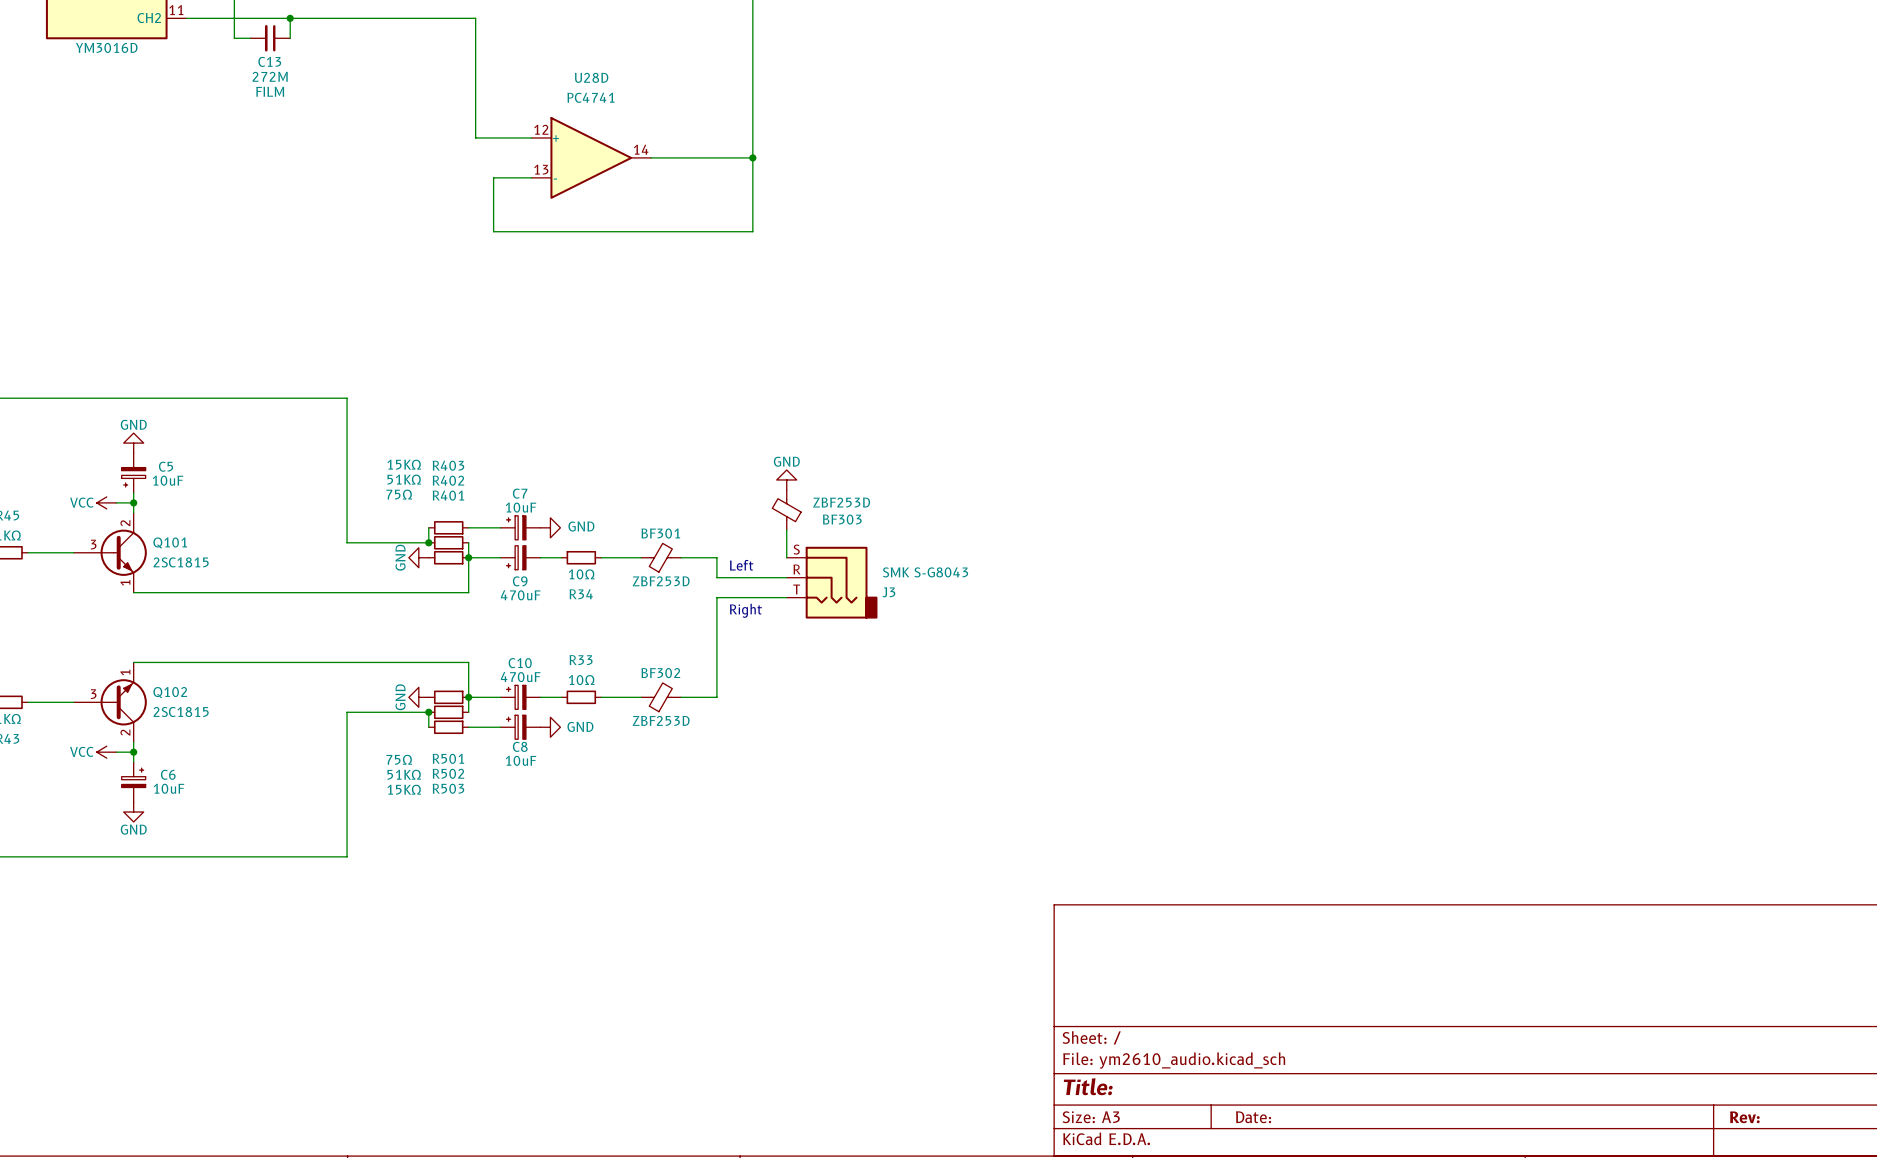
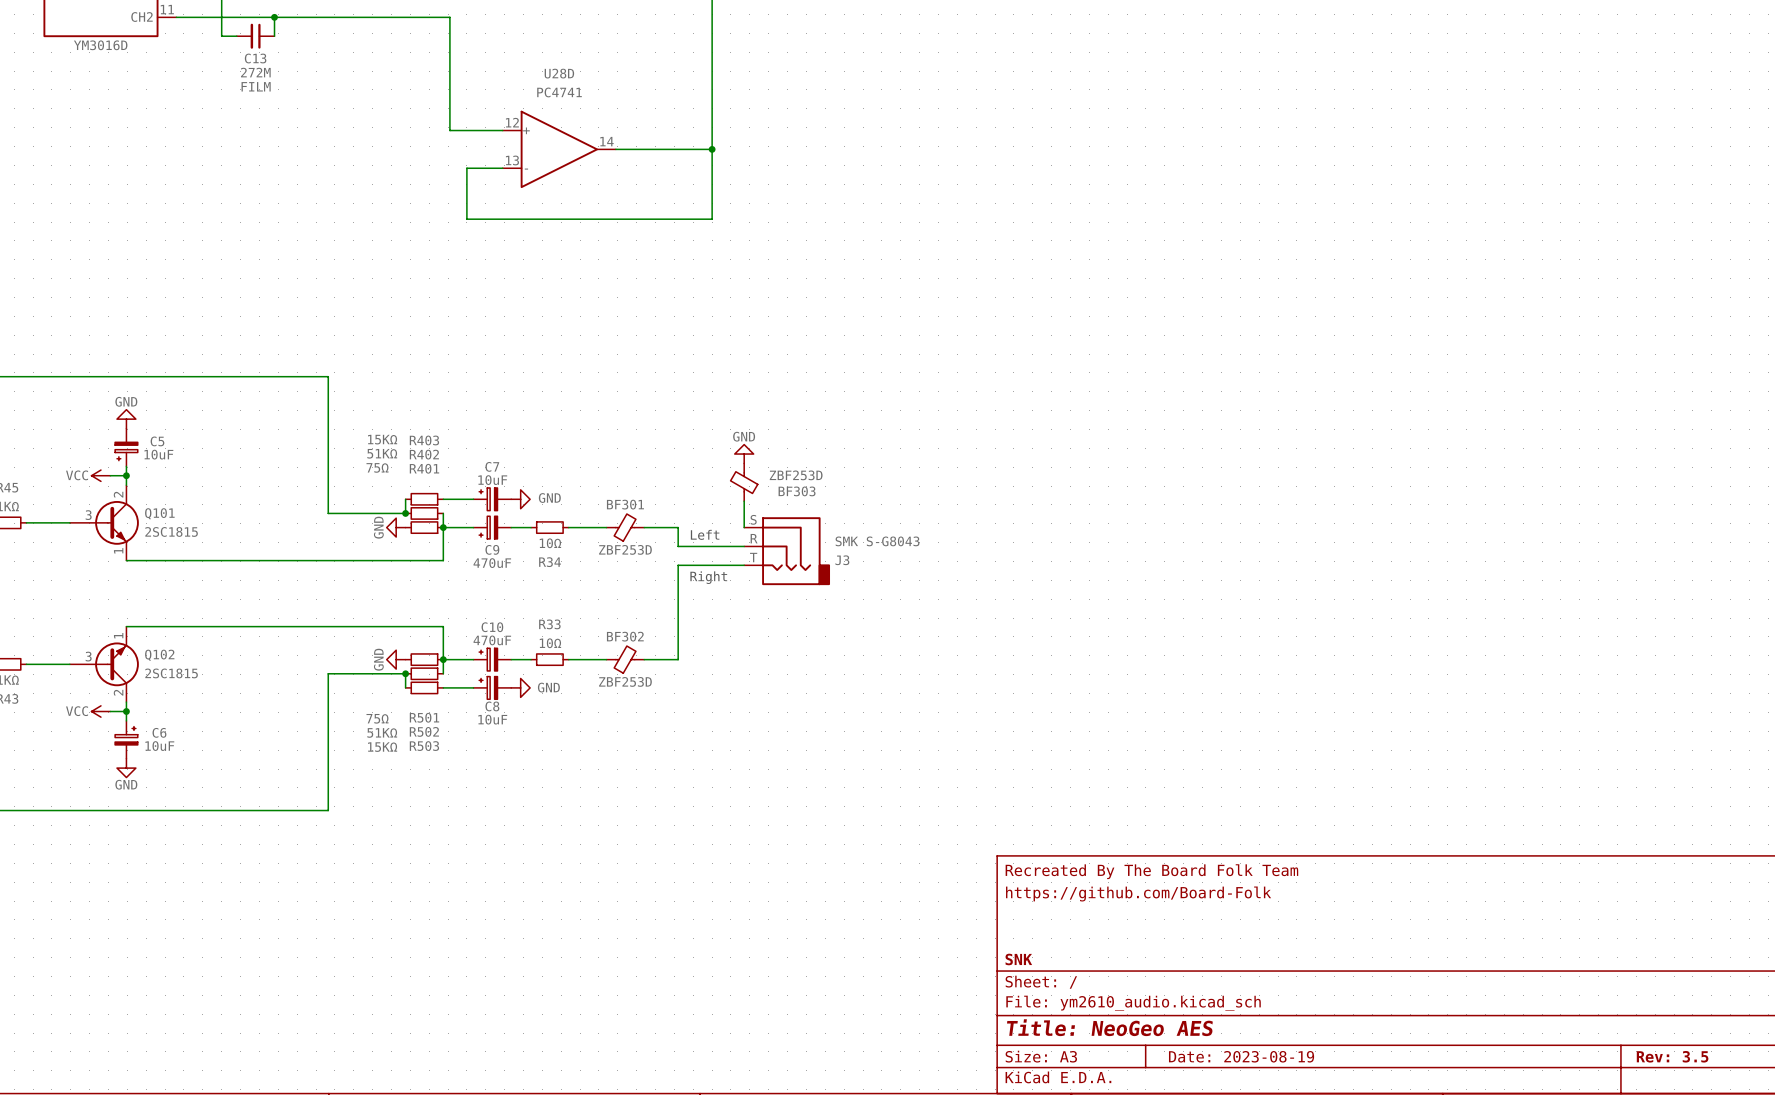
title block: none -> Recreated By The Board Folk Team (1151, 871)
title block: none -> https://github.com/Board-Folk (1138, 894)
title block: none -> SNK (1018, 959)
title block: Title: (1088, 1086) -> Title: NeoGeo AES (1109, 1027)
title block: Date: (1253, 1117) -> Date: 2023-08-19 (1241, 1056)
title block: Rev: (1744, 1117) -> Rev: 3.5 (1672, 1056)

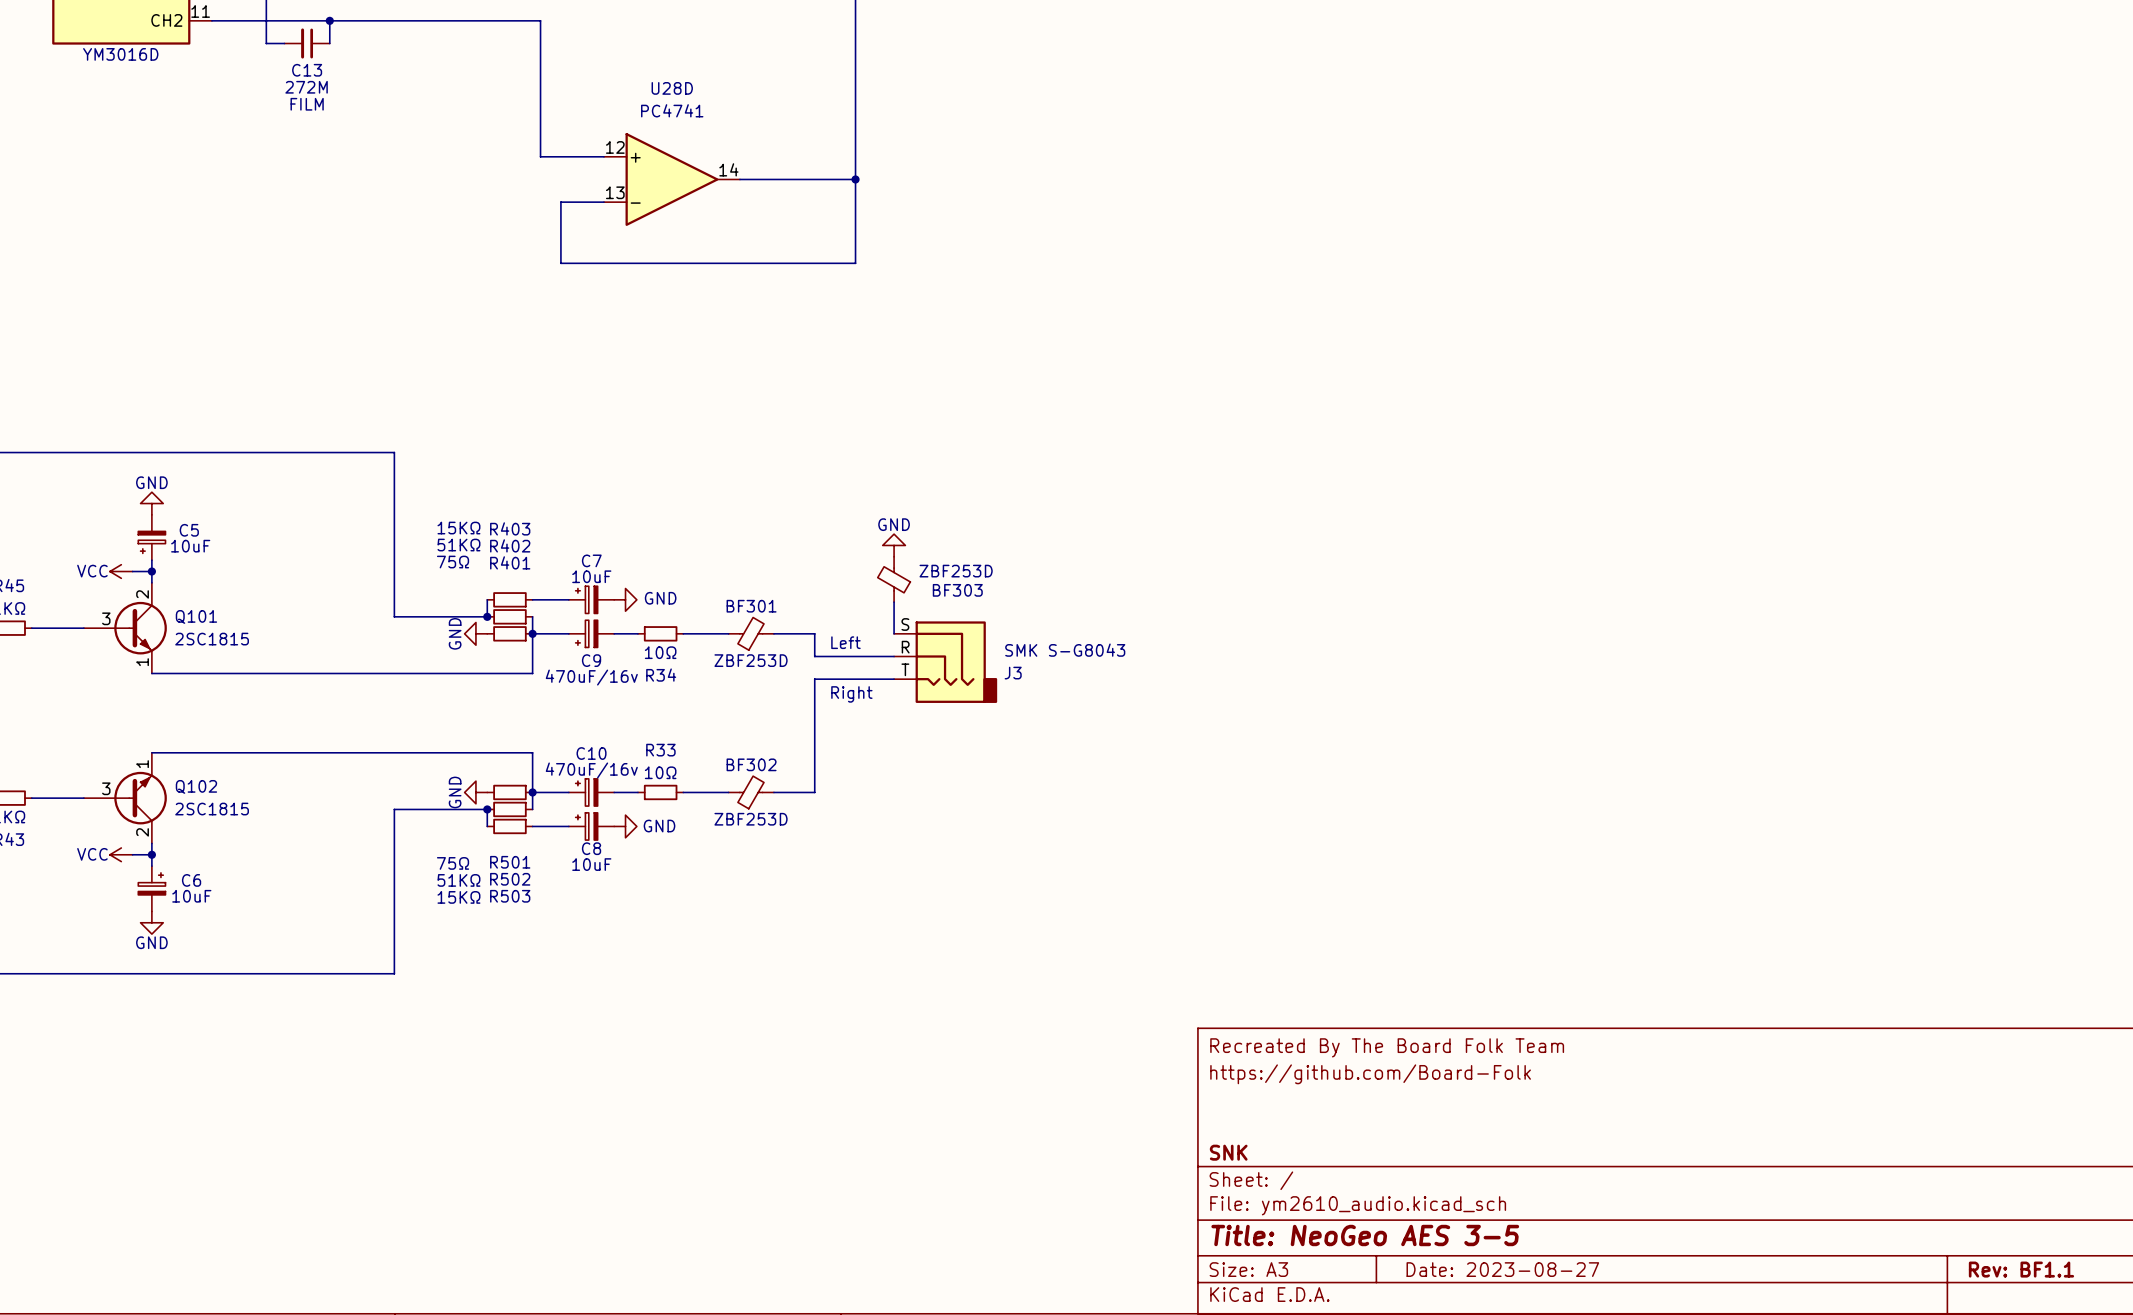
C9 value: 470uF (492, 563) -> 470uF/16v (591, 677)
C10 value: 470uF (492, 640) -> 470uF/16v (591, 770)
title block: Title: NeoGeo AES (1109, 1027) -> Title: NeoGeo AES 3-5 (1365, 1235)
title block: Date: 2023-08-19 (1241, 1056) -> Date: 2023-08-27 (1502, 1269)
title block: Rev: 3.5 (1672, 1056) -> Rev: BF1.1 (2021, 1269)

